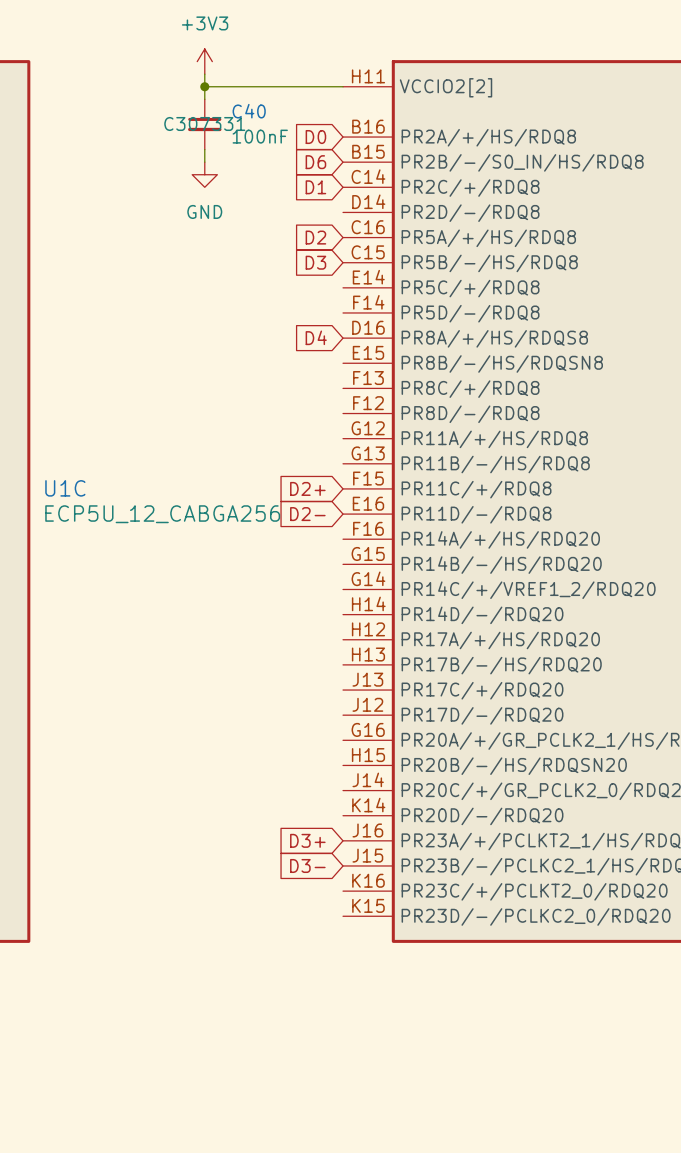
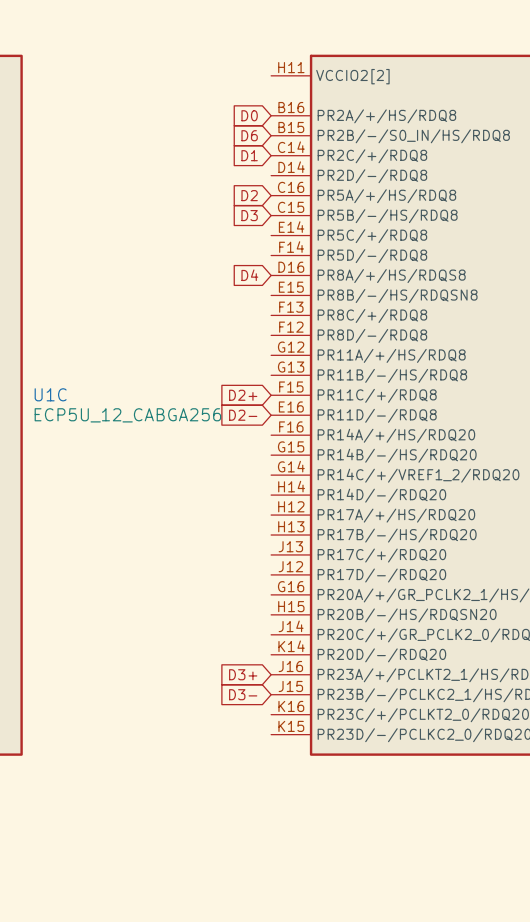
power symbol: +3V3 (204, 61) -> none
wire: (204, 74) (204, 99) -> none
wire: (204, 86) (343, 86) -> none
junction: (204, 86) -> none
C40: 100nF (204, 124) -> none
wire: (204, 149) (204, 162) -> none
power symbol: GND (204, 174) -> none

